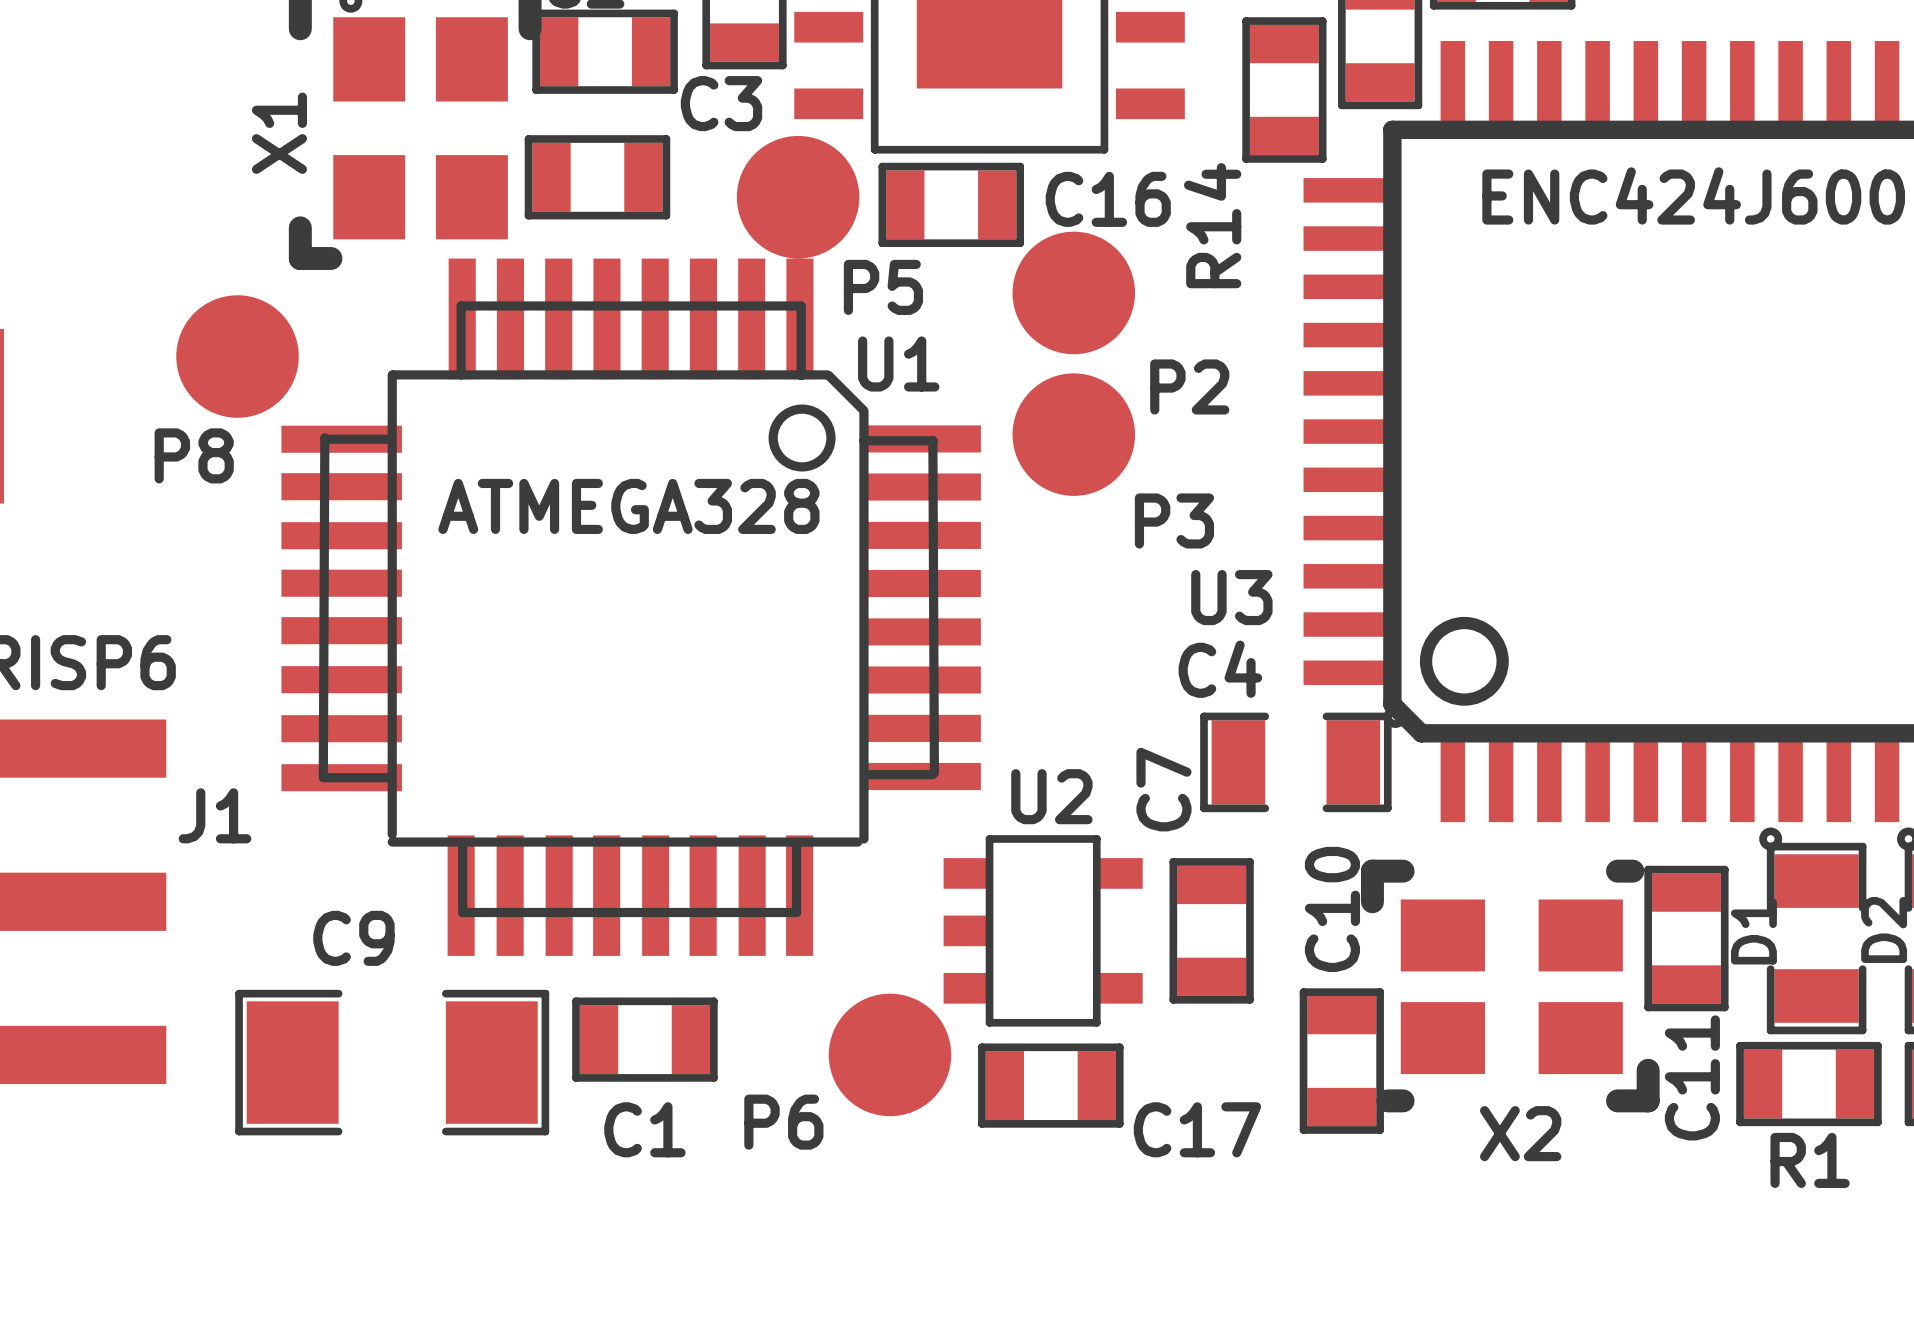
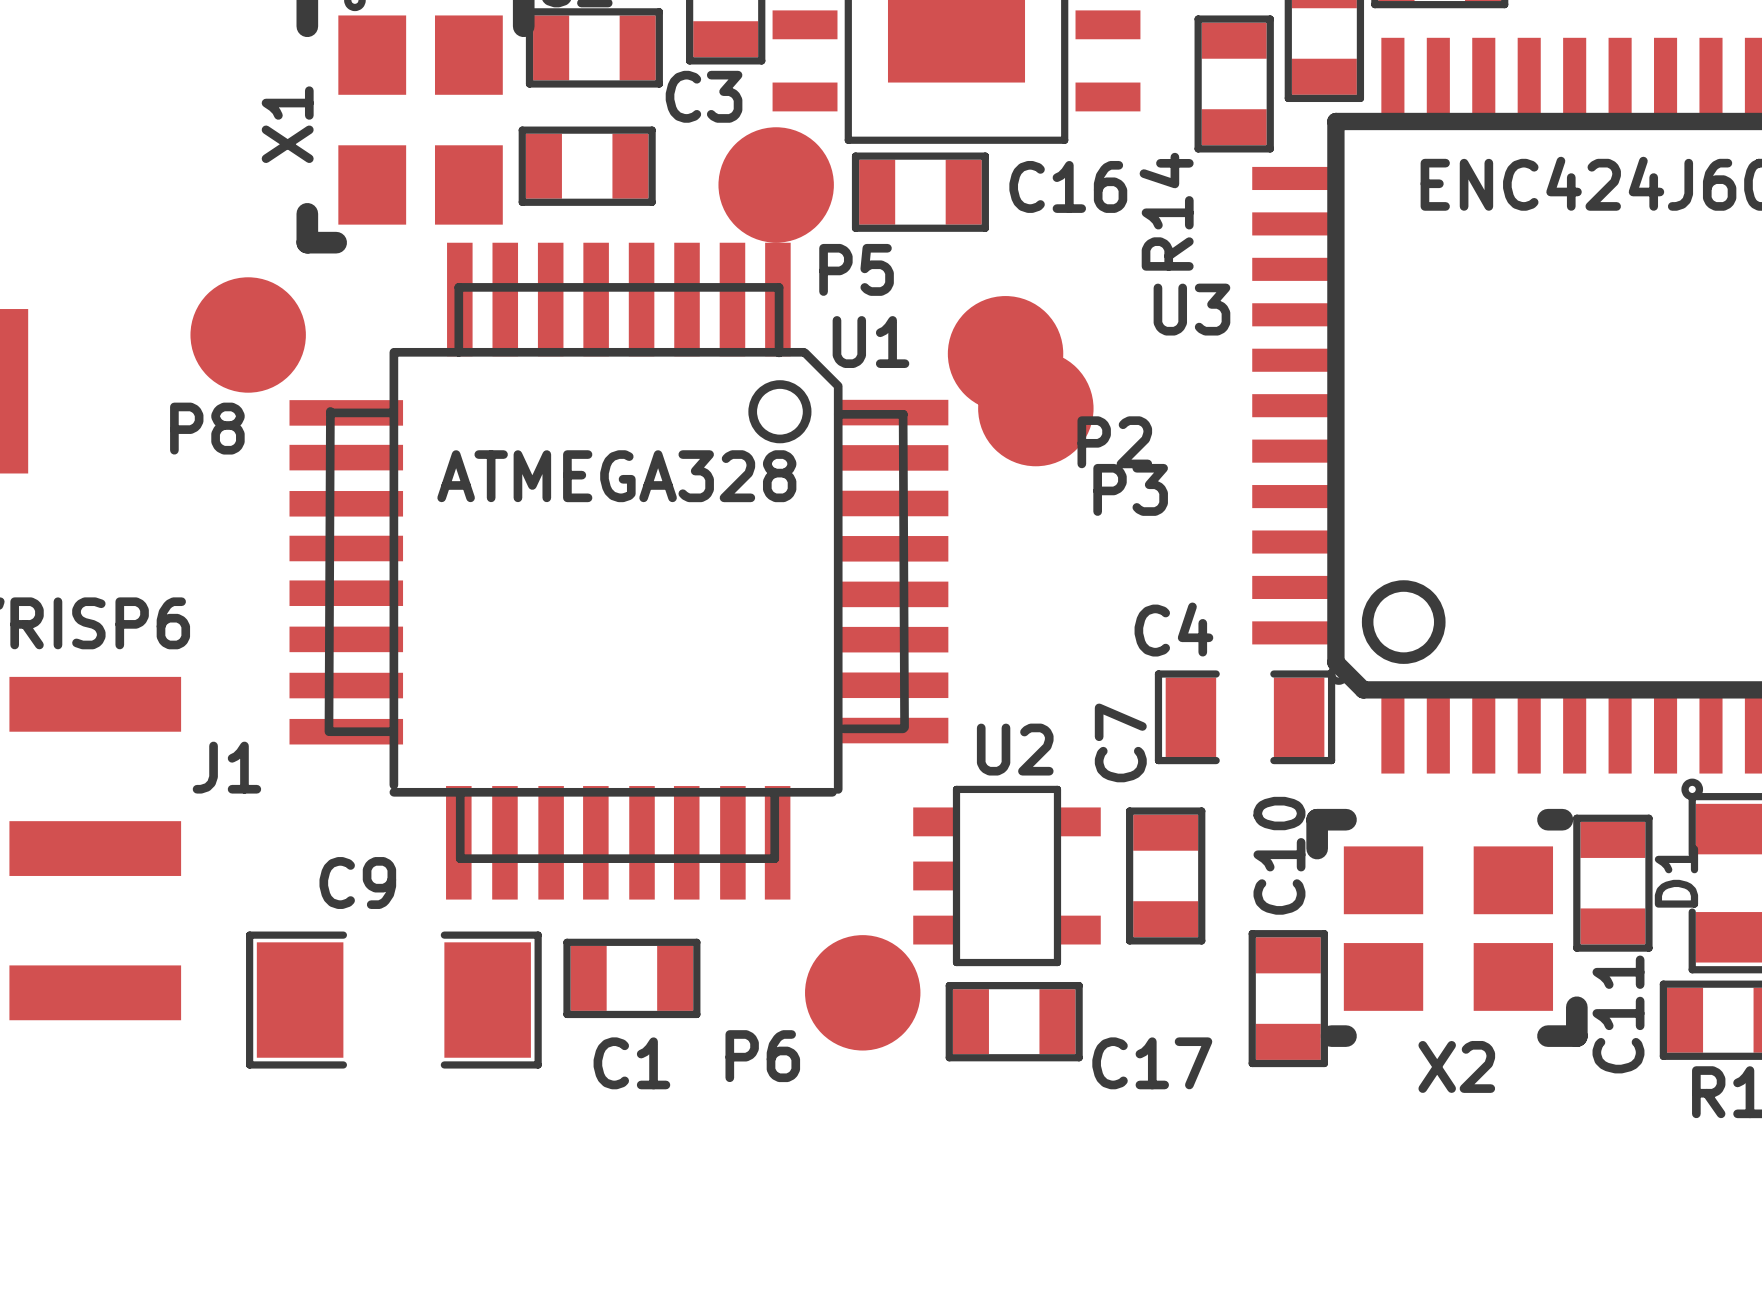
P2 position: (1073, 292) -> (1005, 353)
U3 name position: U3 (1231, 597) -> U3 (1191, 309)

